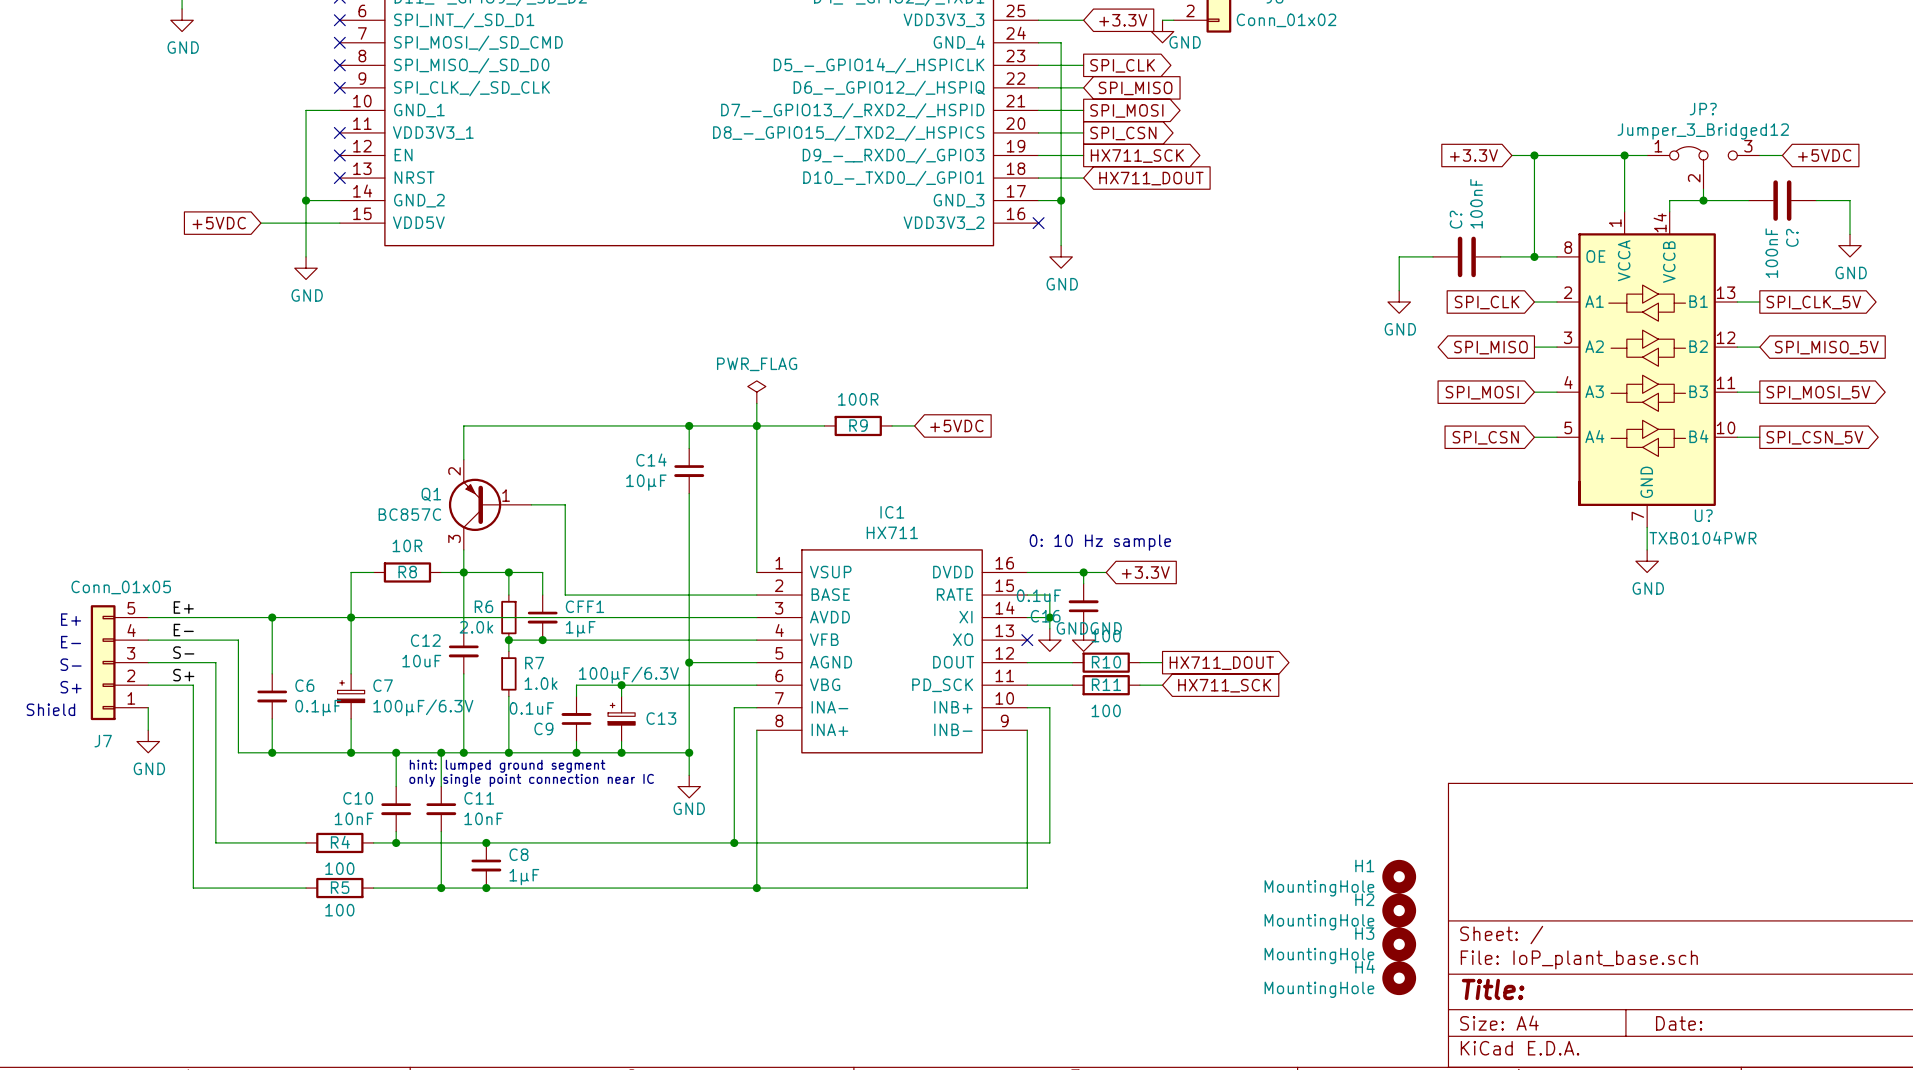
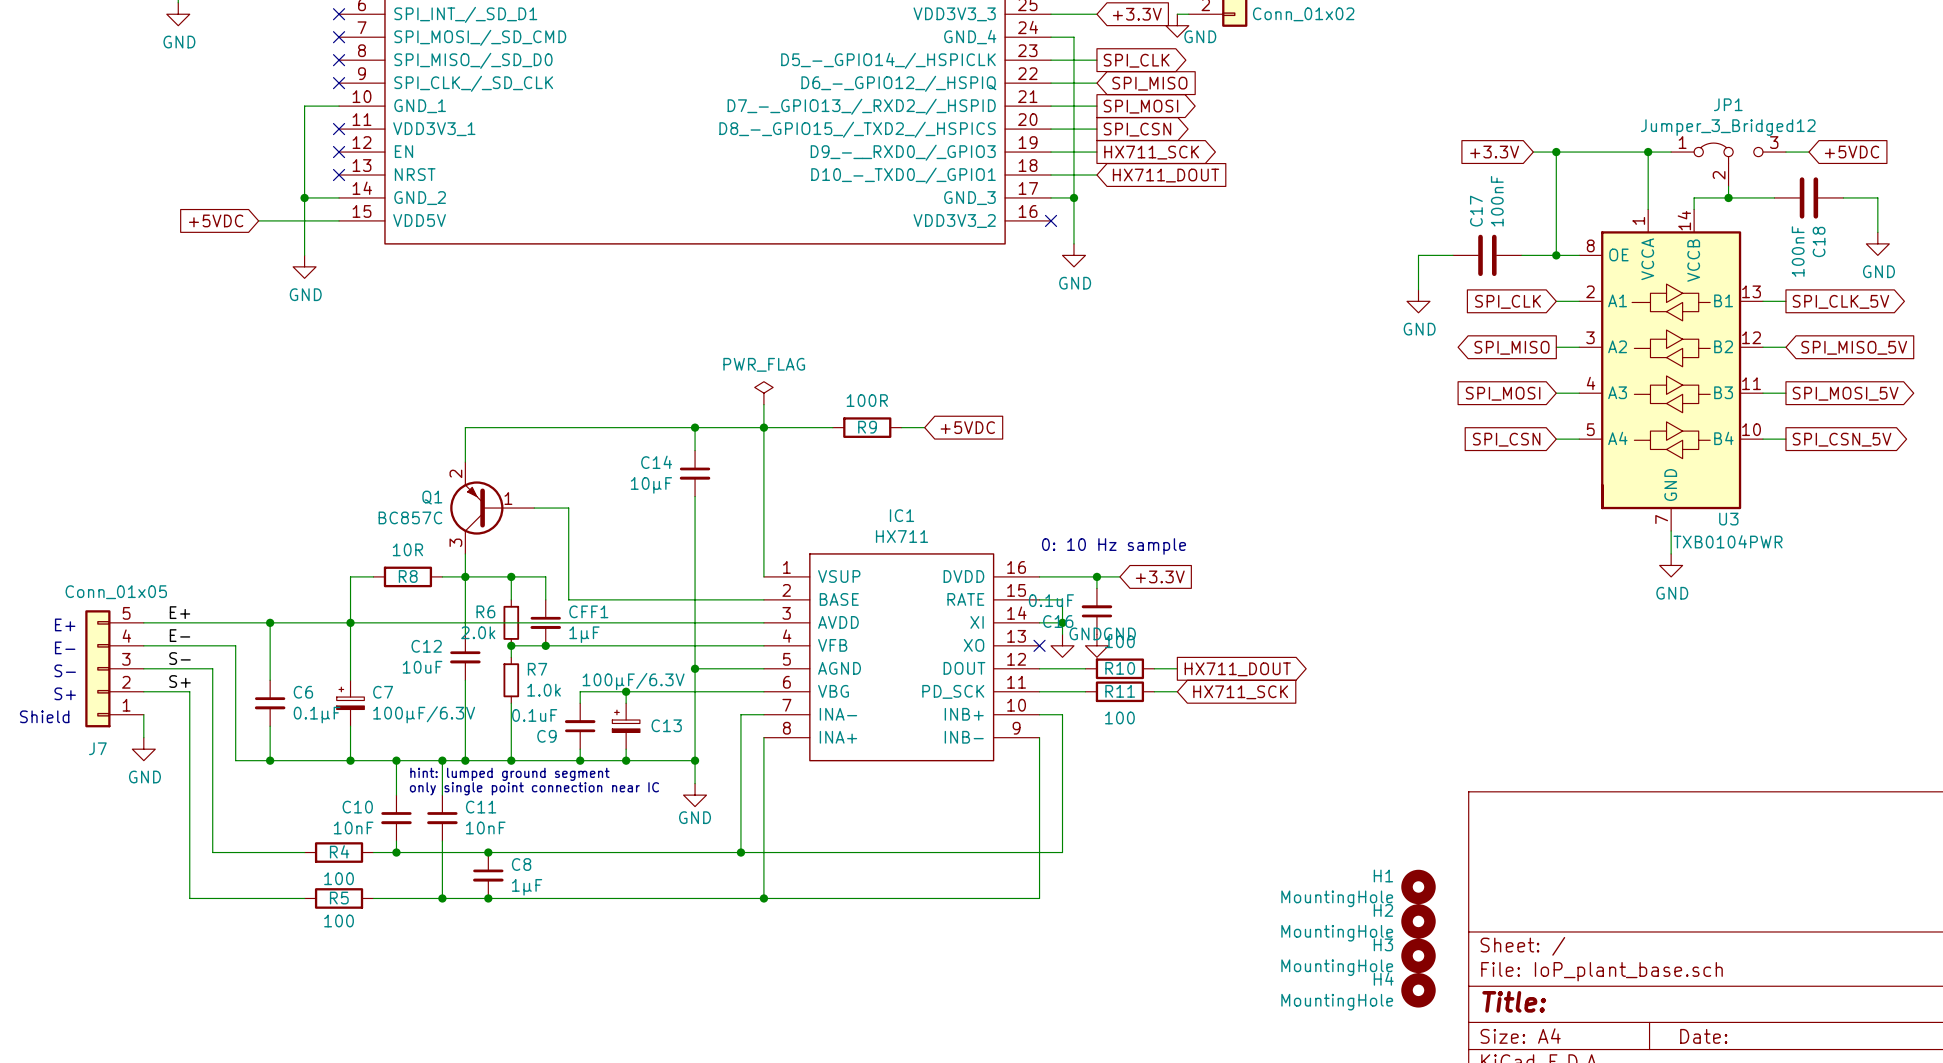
JP? name: JP? (1703, 109) -> JP1 (1728, 104)
C? name: C? (1456, 219) -> C17 (1476, 211)
C? name: C? (1792, 237) -> C18 (1819, 241)
U? name: U? (1703, 515) -> U3 (1728, 519)

